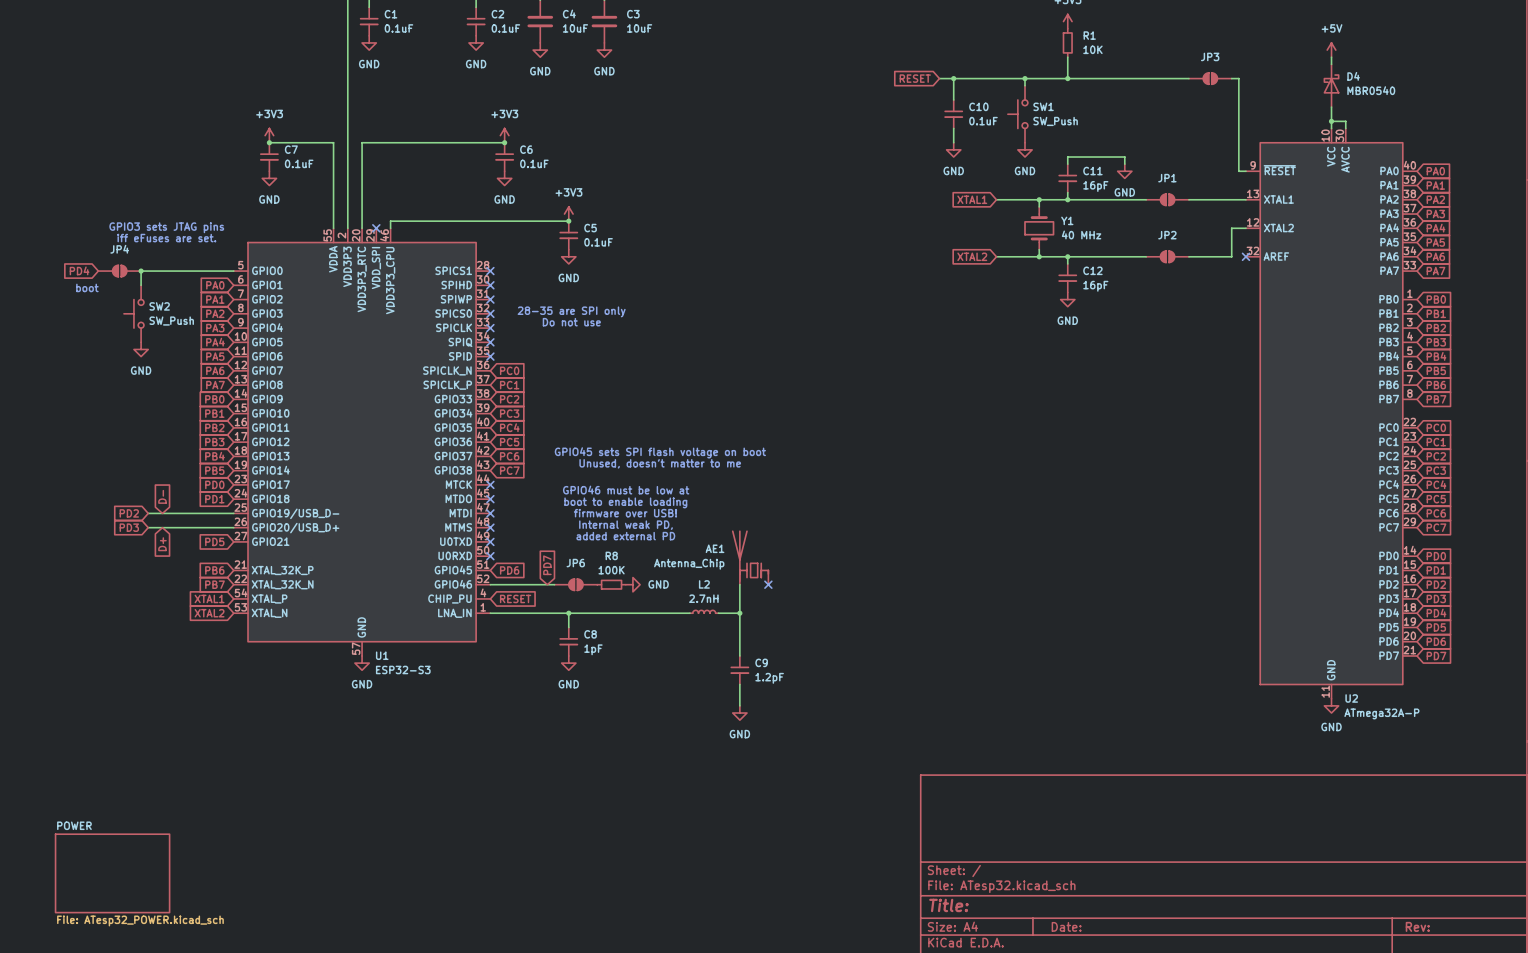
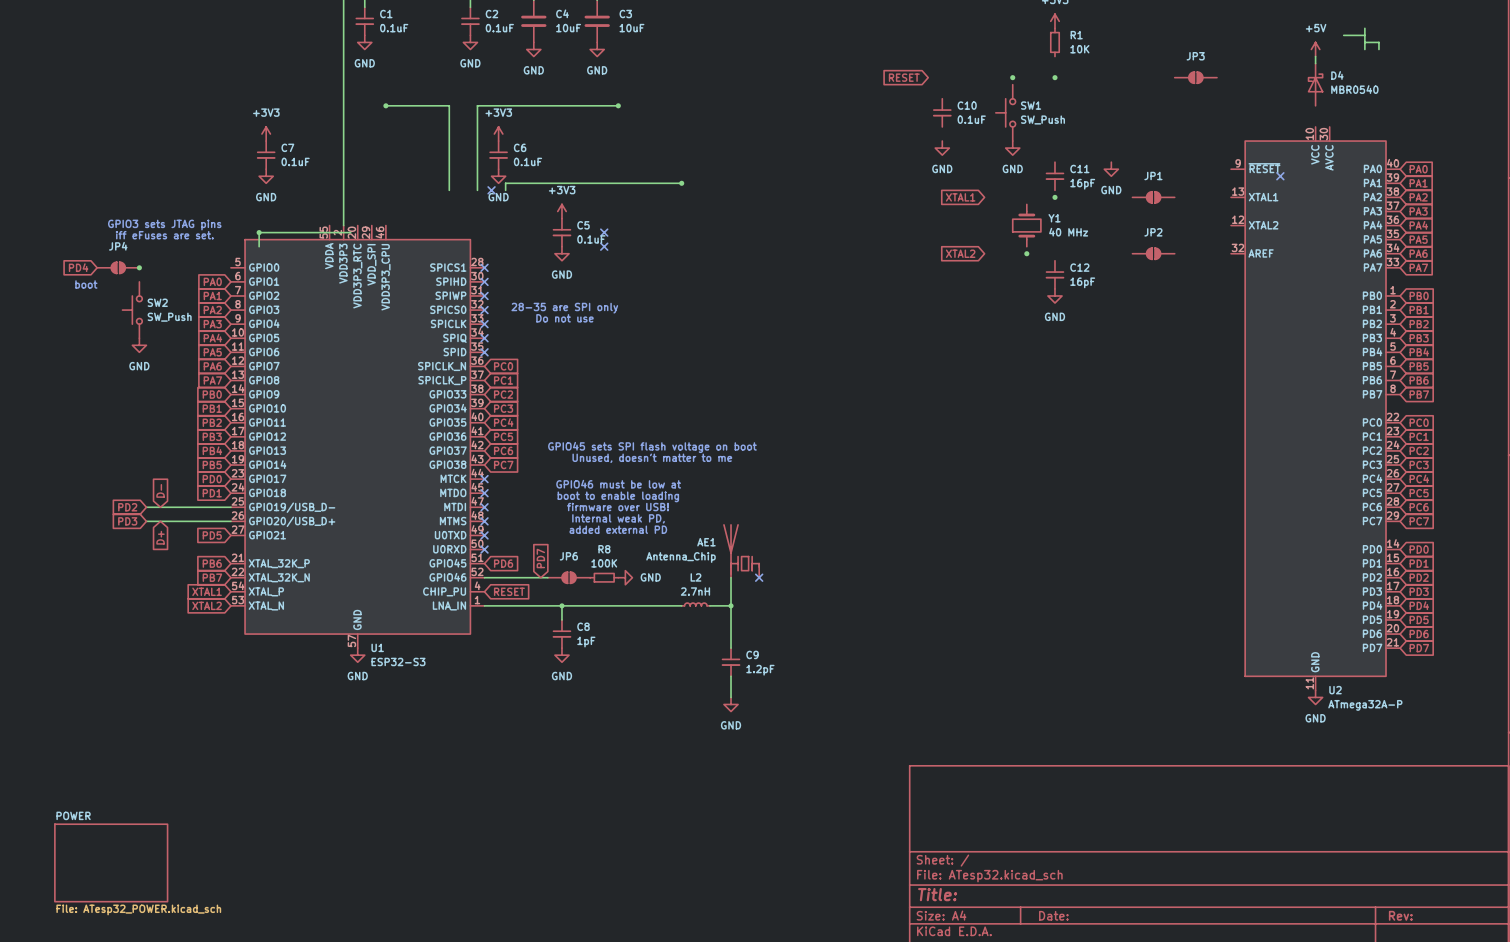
wire: none -> (1343, 35) (1364, 35)
wire: (1067, 57) (1067, 78) -> none
wire: (939, 78) (1188, 78) -> none
wire: (953, 78) (953, 99) -> none
junction: (953, 78) -> none
wire: (1024, 78) (1024, 85) -> none
wire: (1231, 78) (1238, 78) (1238, 171) (1245, 171) -> none
junction: none -> (385, 105)
junction: none -> (618, 105)
wire: (1331, 107) (1331, 128) -> (1364, 28) (1364, 49)
wire: (1331, 121) (1345, 121) (1345, 128) -> (1364, 42) (1378, 42) (1378, 49)
junction: (1331, 121) -> none
wire: (953, 128) (953, 142) -> none
wire: (269, 142) (333, 142) (333, 228) -> (385, 105) (449, 105) (449, 190)
junction: (269, 142) -> none
wire: (504, 142) (362, 142) (362, 228) -> (618, 105) (477, 105) (477, 190)
junction: (504, 142) -> none
wire: (1067, 164) (1067, 157) (1124, 157) (1124, 164) -> none
no-connect mark: none -> (1280, 176)
junction: none -> (681, 183)
no-connect mark: none -> (491, 190)
wire: (1067, 192) (1067, 199) -> none
wire: (996, 199) (1146, 199) -> none
wire: (1039, 199) (1039, 206) -> none
junction: (1039, 199) -> none
wire: (1188, 199) (1245, 199) -> none
wire: (568, 221) (390, 221) (390, 228) -> (681, 183) (505, 183) (505, 190)
junction: (568, 221) -> none
no-connect mark: (376, 228) -> none
wire: (1245, 228) (1231, 228) (1231, 256) (1188, 256) -> none
junction: none -> (259, 232)
no-connect mark: none -> (604, 232)
no-connect mark: none -> (604, 246)
wire: (1039, 249) (1039, 256) -> none
wire: (996, 256) (1146, 256) -> none
wire: (1067, 256) (1067, 263) -> none
junction: (1067, 256) -> none
no-connect mark: (1245, 256) -> none
wire: (233, 271) (141, 271) (141, 285) -> (350, 232) (259, 232) (259, 246)

